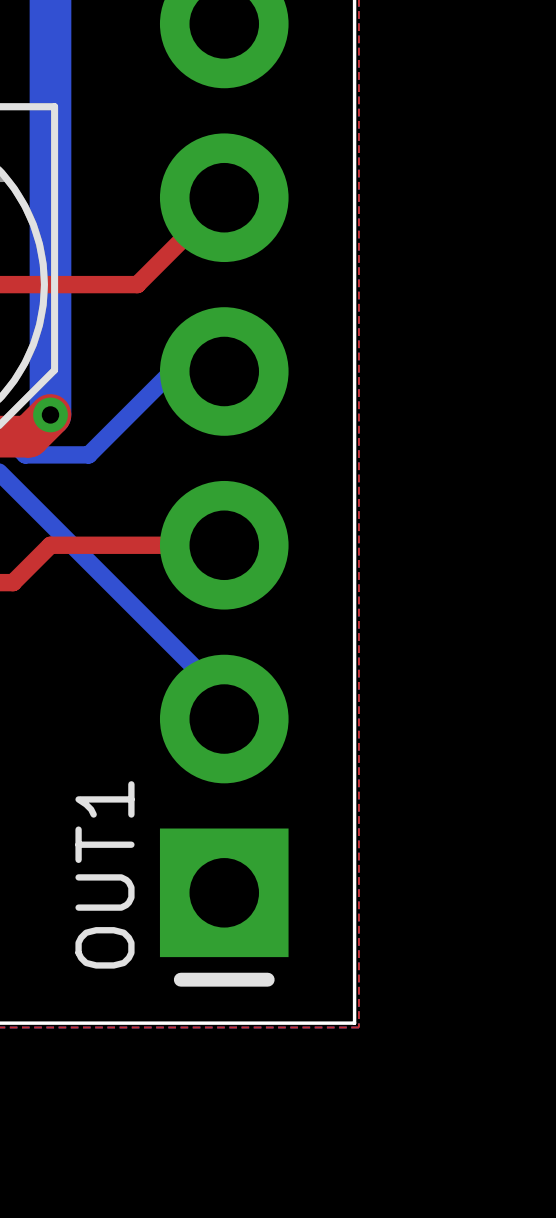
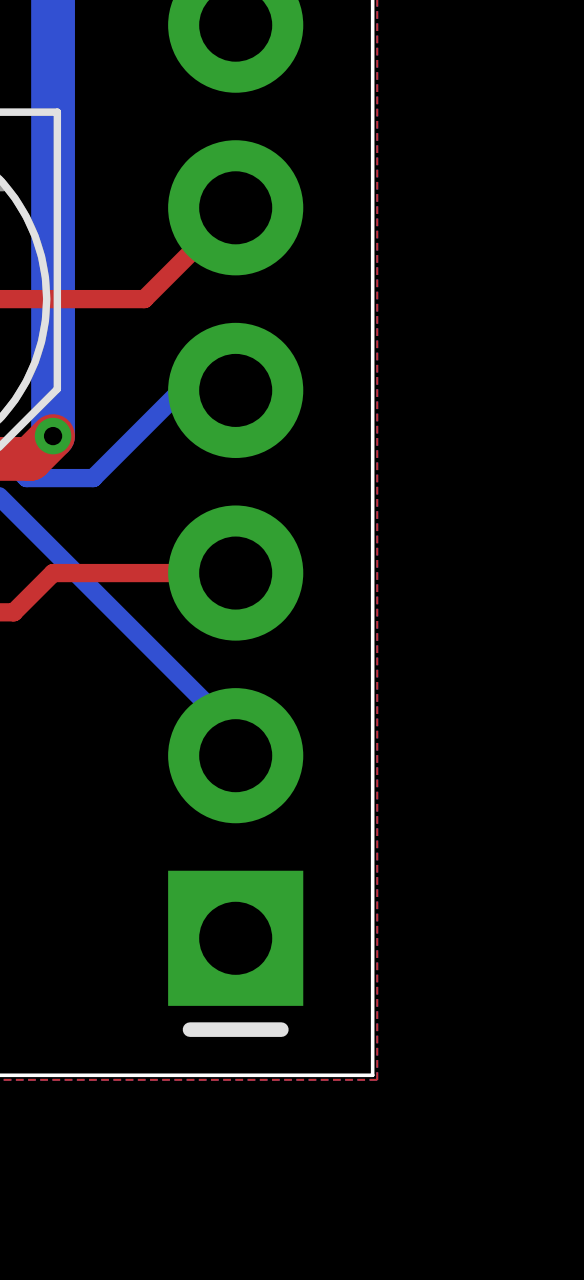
OUT1 name: OUT1 (104, 874) -> none

